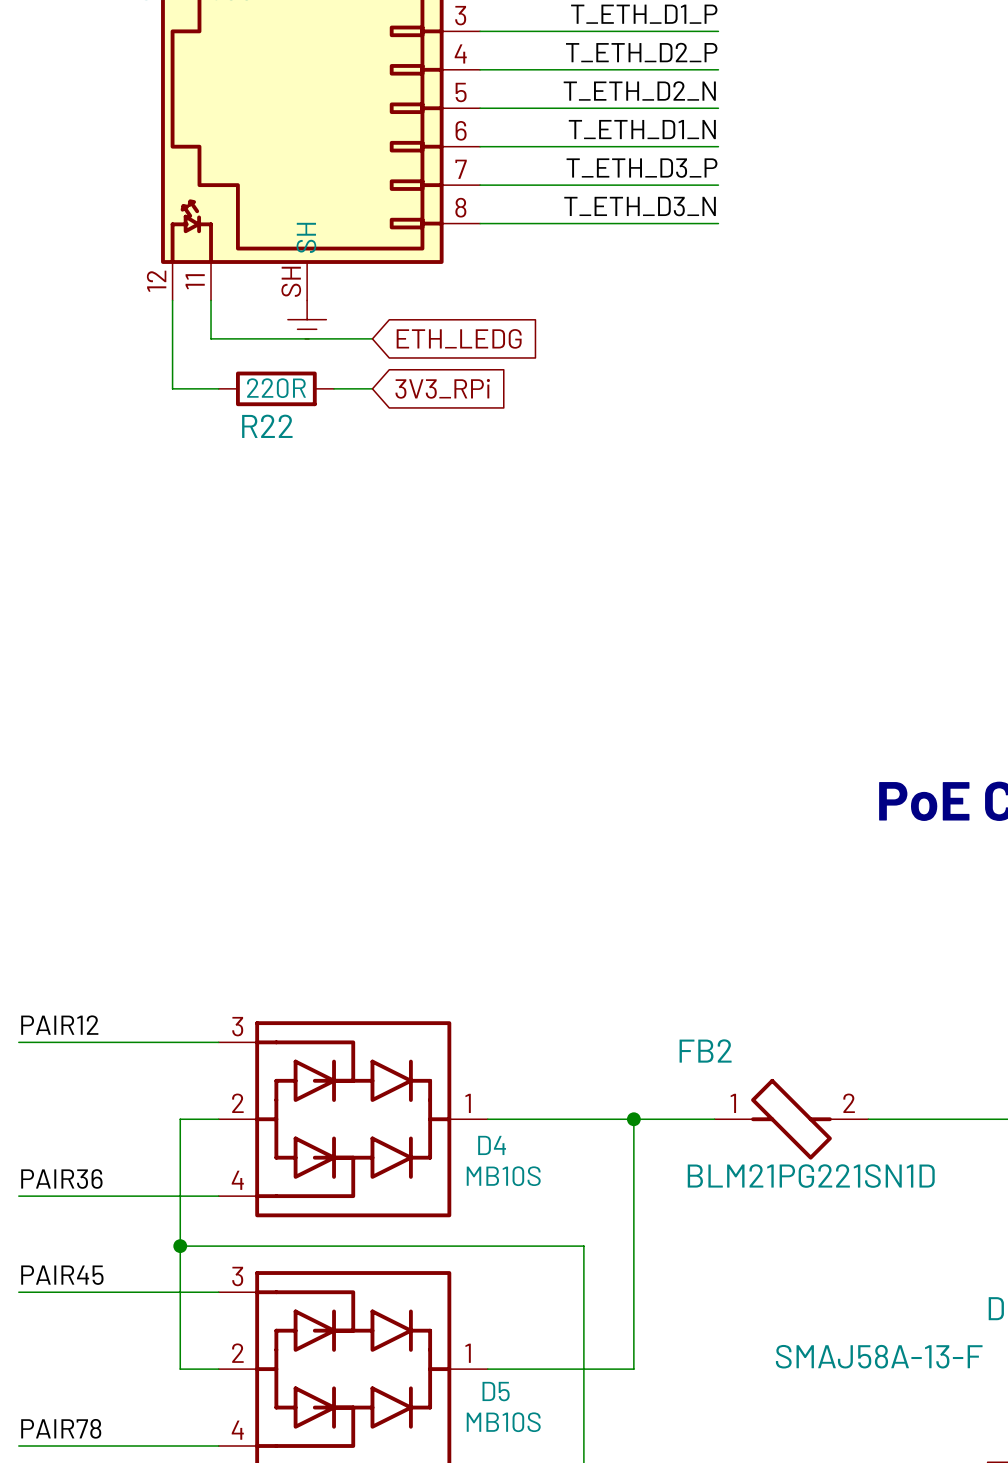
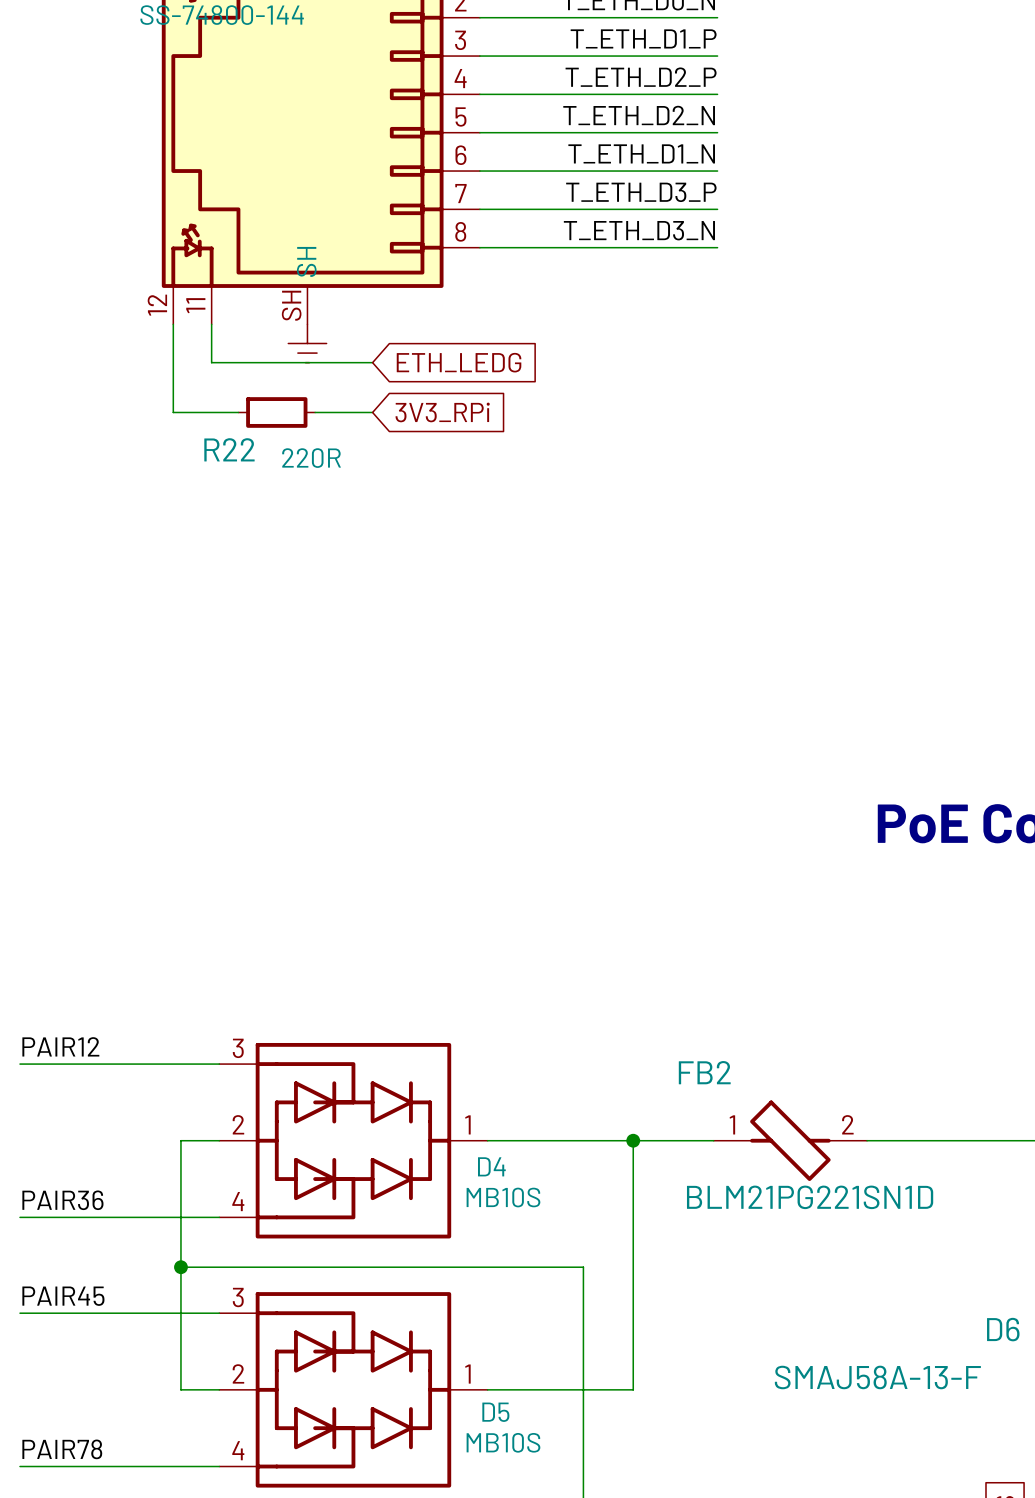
R22 symbol: [218, 371, 335, 407] -> [238, 397, 316, 428]
R22 text position: 220R (276, 388) -> 220R (311, 458)
R22 name position: R22 (267, 426) -> R22 (229, 449)

